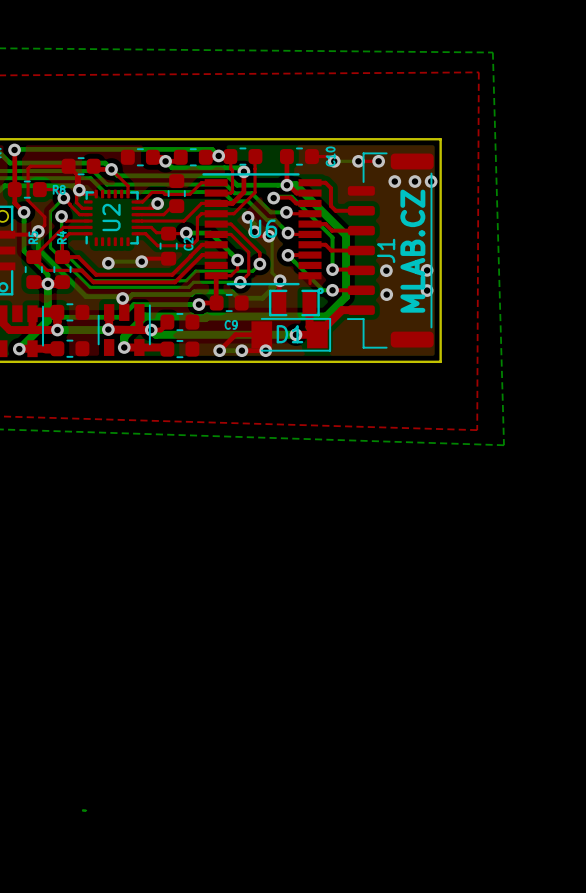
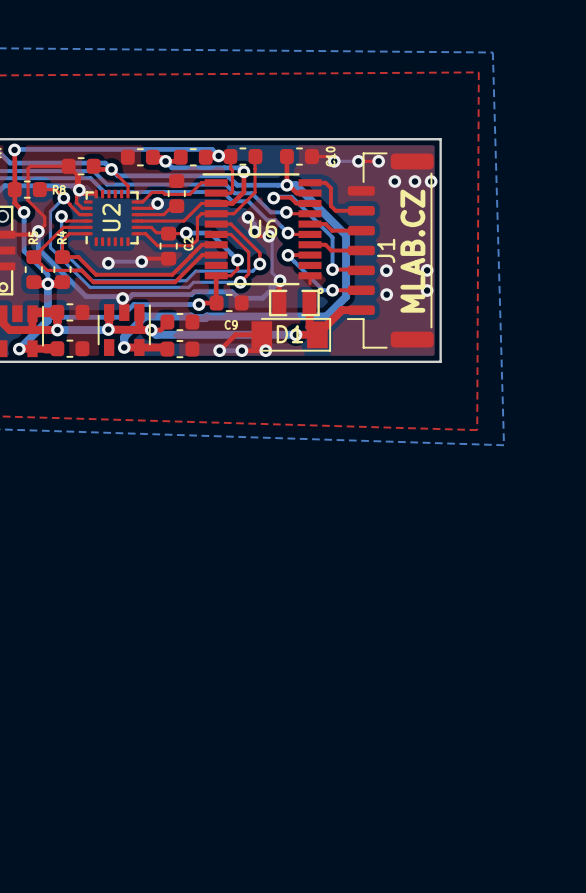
bottom zone outline: (82, 810) (86, 810) (86, 810) (82, 810) -> none

